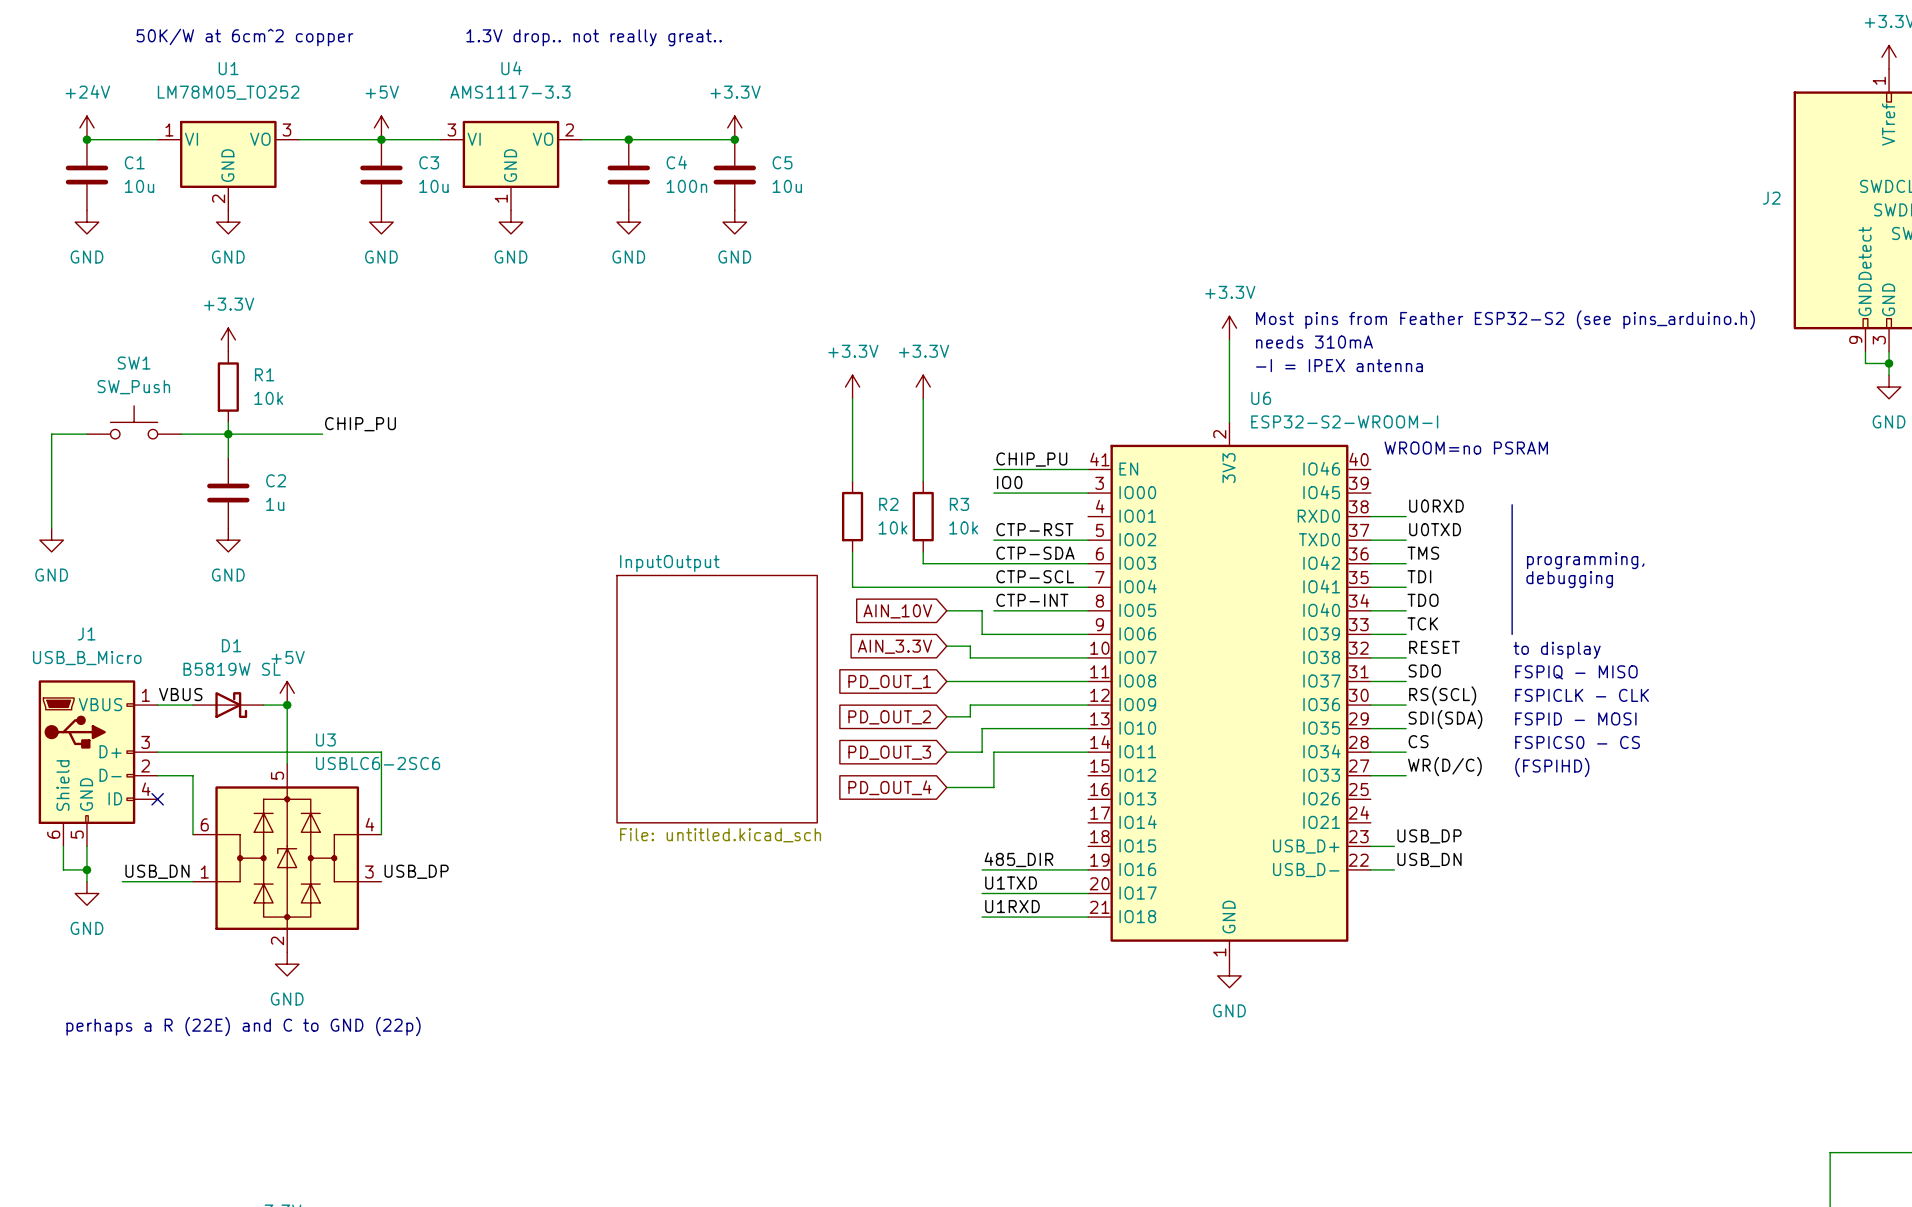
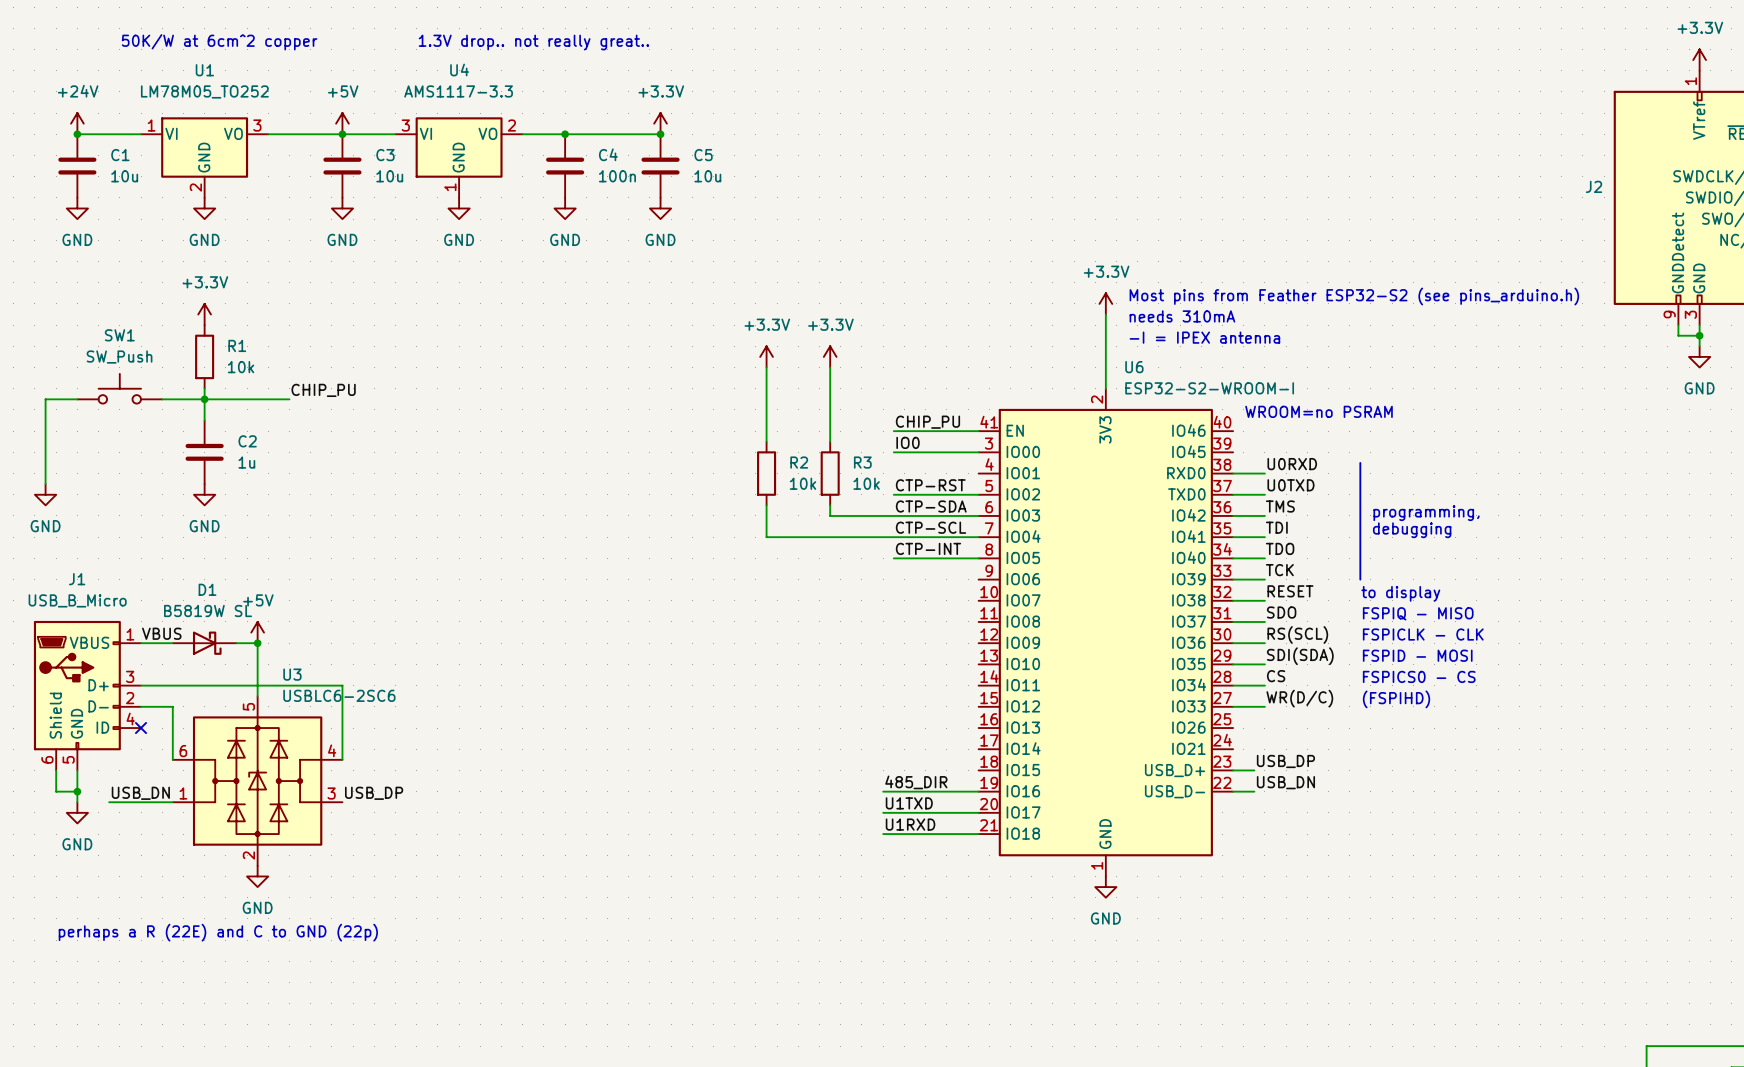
wire: (946, 610) (982, 610) (982, 634) (1088, 634) -> none
global label: AIN_10V (897, 611) -> none
global label: AIN_3.3V (895, 646) -> none
wire: (946, 646) (970, 646) (970, 657) (1088, 657) -> none
wire: (946, 681) (1088, 681) -> none
global label: PD_OUT_1 (889, 682) -> none
sheet InputOutput: File: untitled.kicad_sch (717, 699) -> none
wire: (1088, 705) (970, 705) (970, 716) (946, 716) -> none
global label: PD_OUT_2 (889, 717) -> none
wire: (1088, 728) (982, 728) (982, 752) (946, 752) -> none
global label: PD_OUT_3 (889, 752) -> none
wire: (1088, 752) (993, 752) (993, 787) (946, 787) -> none
global label: PD_OUT_4 (889, 787) -> none

